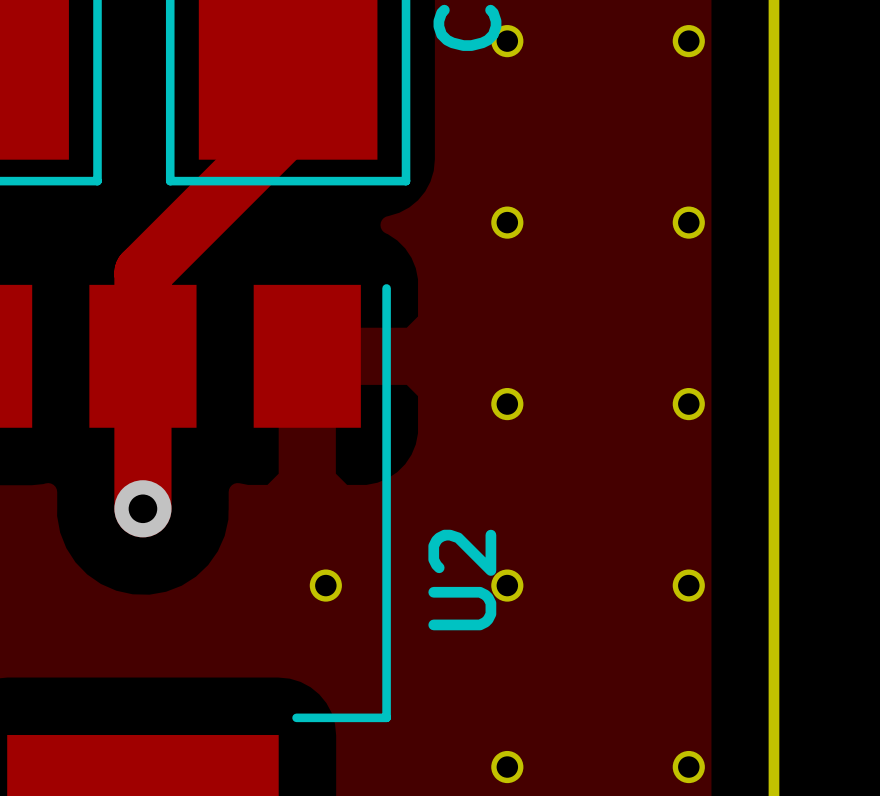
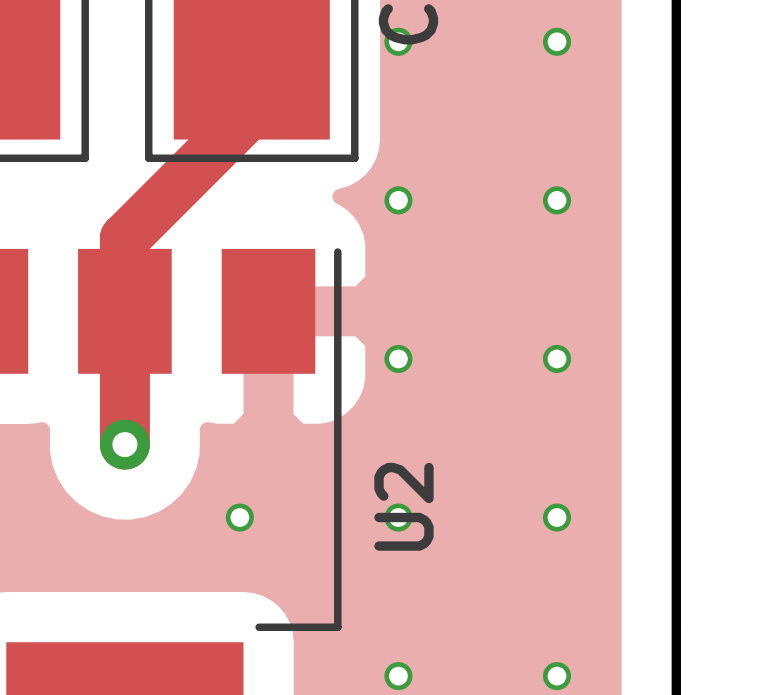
part position: (507, 41) -> (398, 41)
part position: (688, 41) -> (557, 41)
part position: (507, 222) -> (398, 200)
part position: (688, 222) -> (557, 200)
part position: (507, 404) -> (398, 358)
part position: (688, 404) -> (557, 358)
part position: (325, 585) -> (239, 517)
part position: (507, 585) -> (398, 517)
part position: (688, 585) -> (557, 517)
part position: (507, 767) -> (398, 676)
part position: (688, 767) -> (557, 676)

